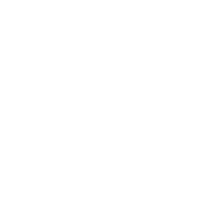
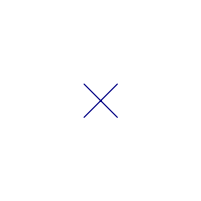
no-connect mark: none -> (100, 100)

